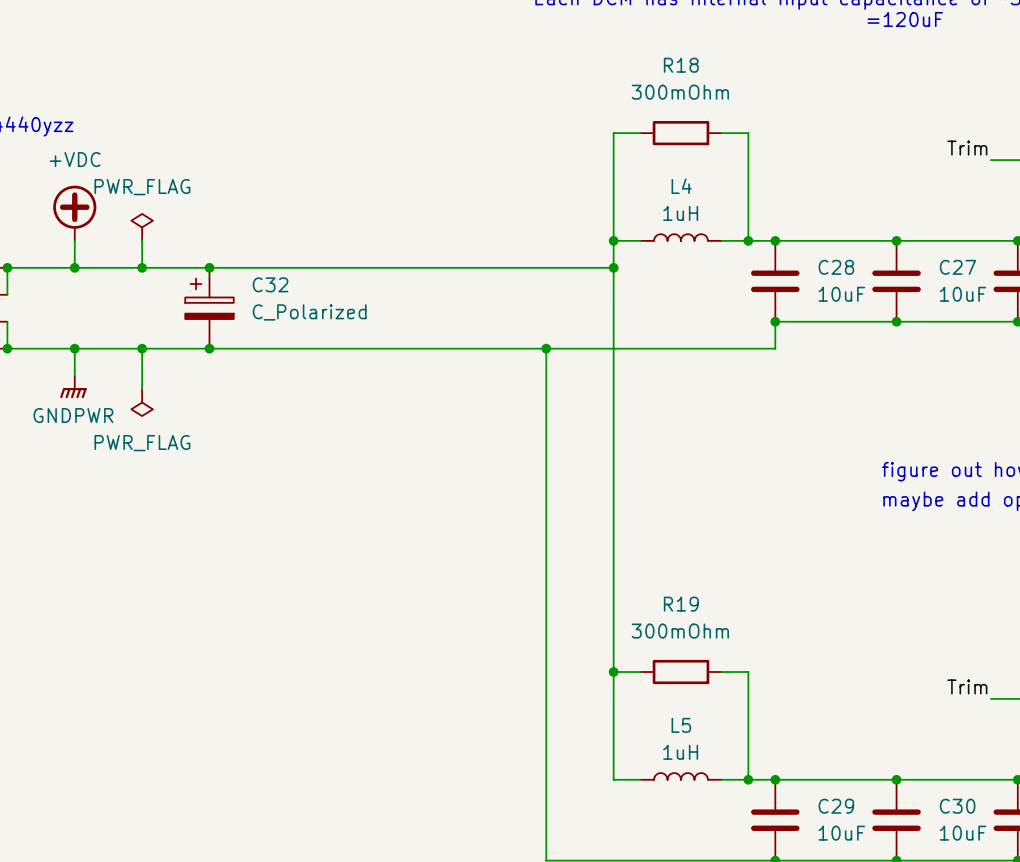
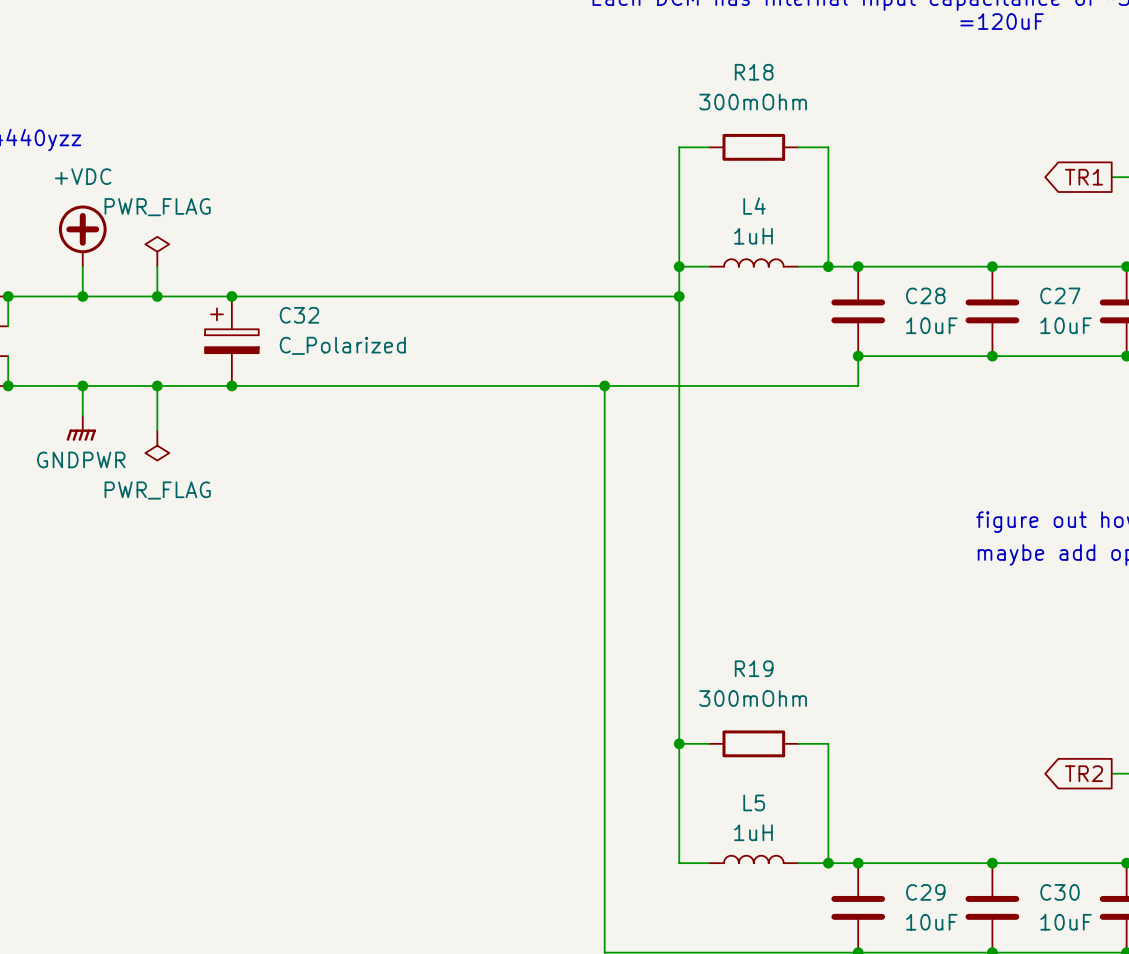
label: Trim (967, 148) -> none
global label: none -> TR1 (1084, 177)
wire: (990, 160) (1004, 160) -> none
label: Trim (967, 686) -> none
global label: none -> TR2 (1084, 773)
wire: (990, 698) (1004, 698) -> none

